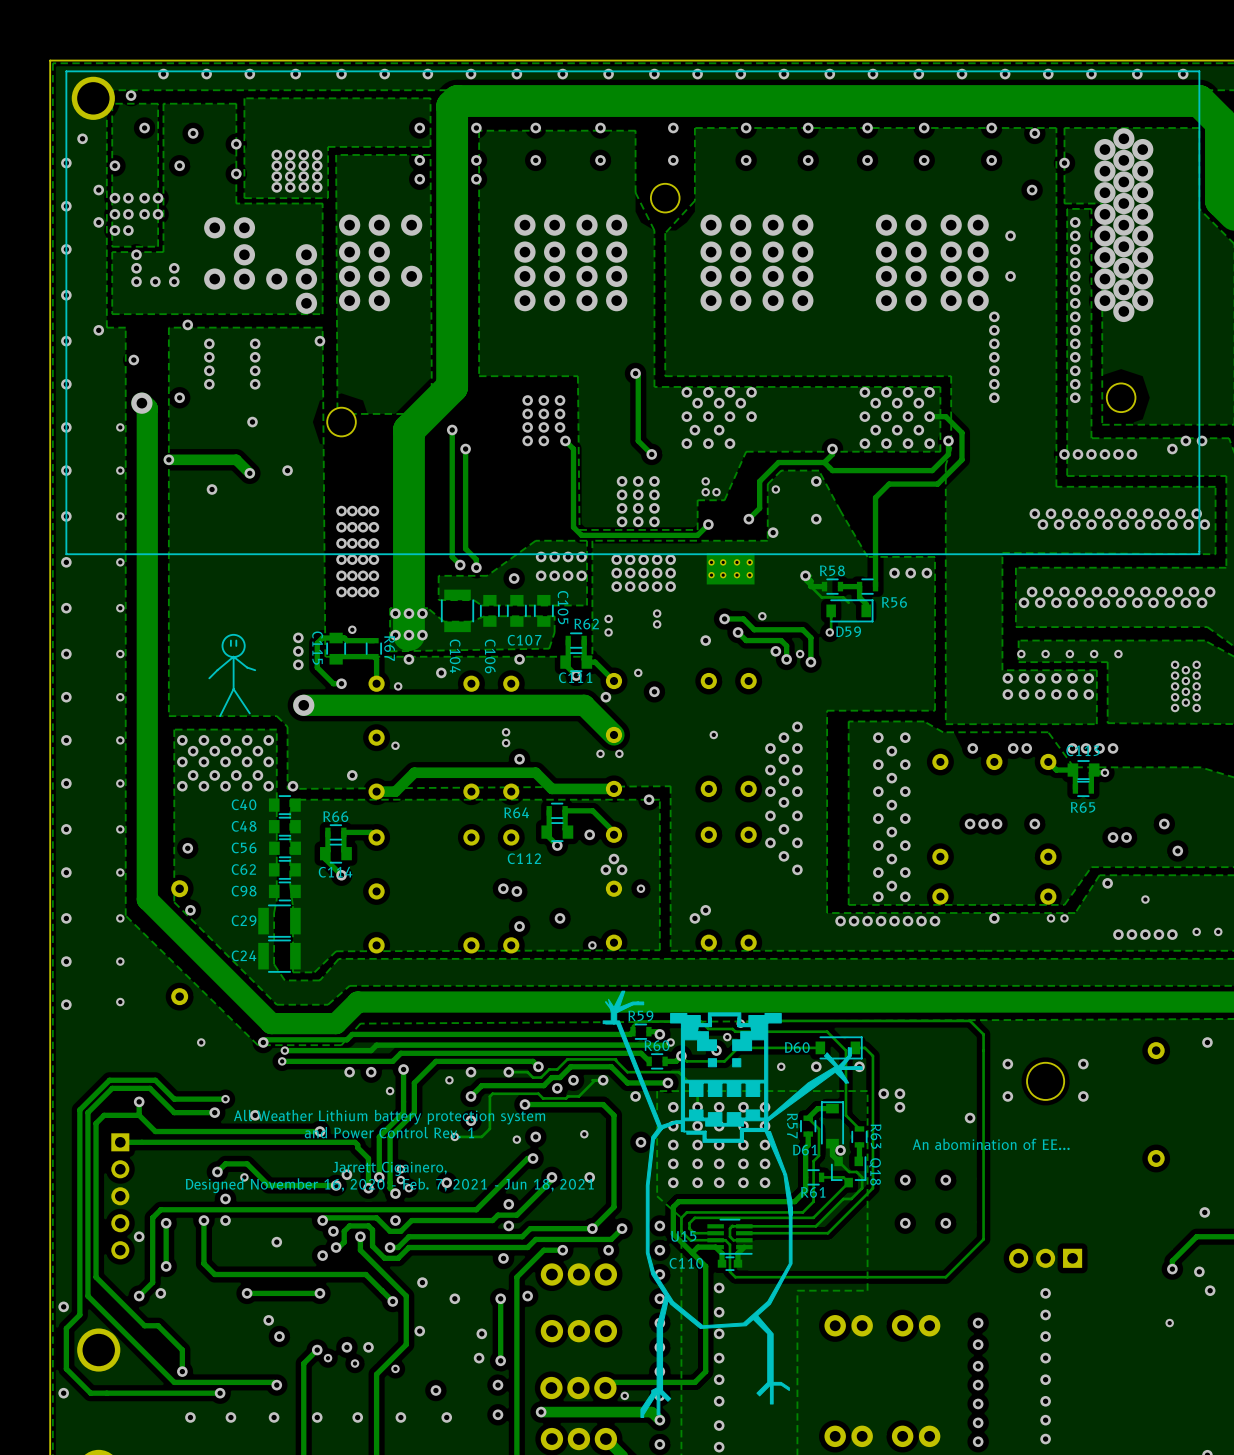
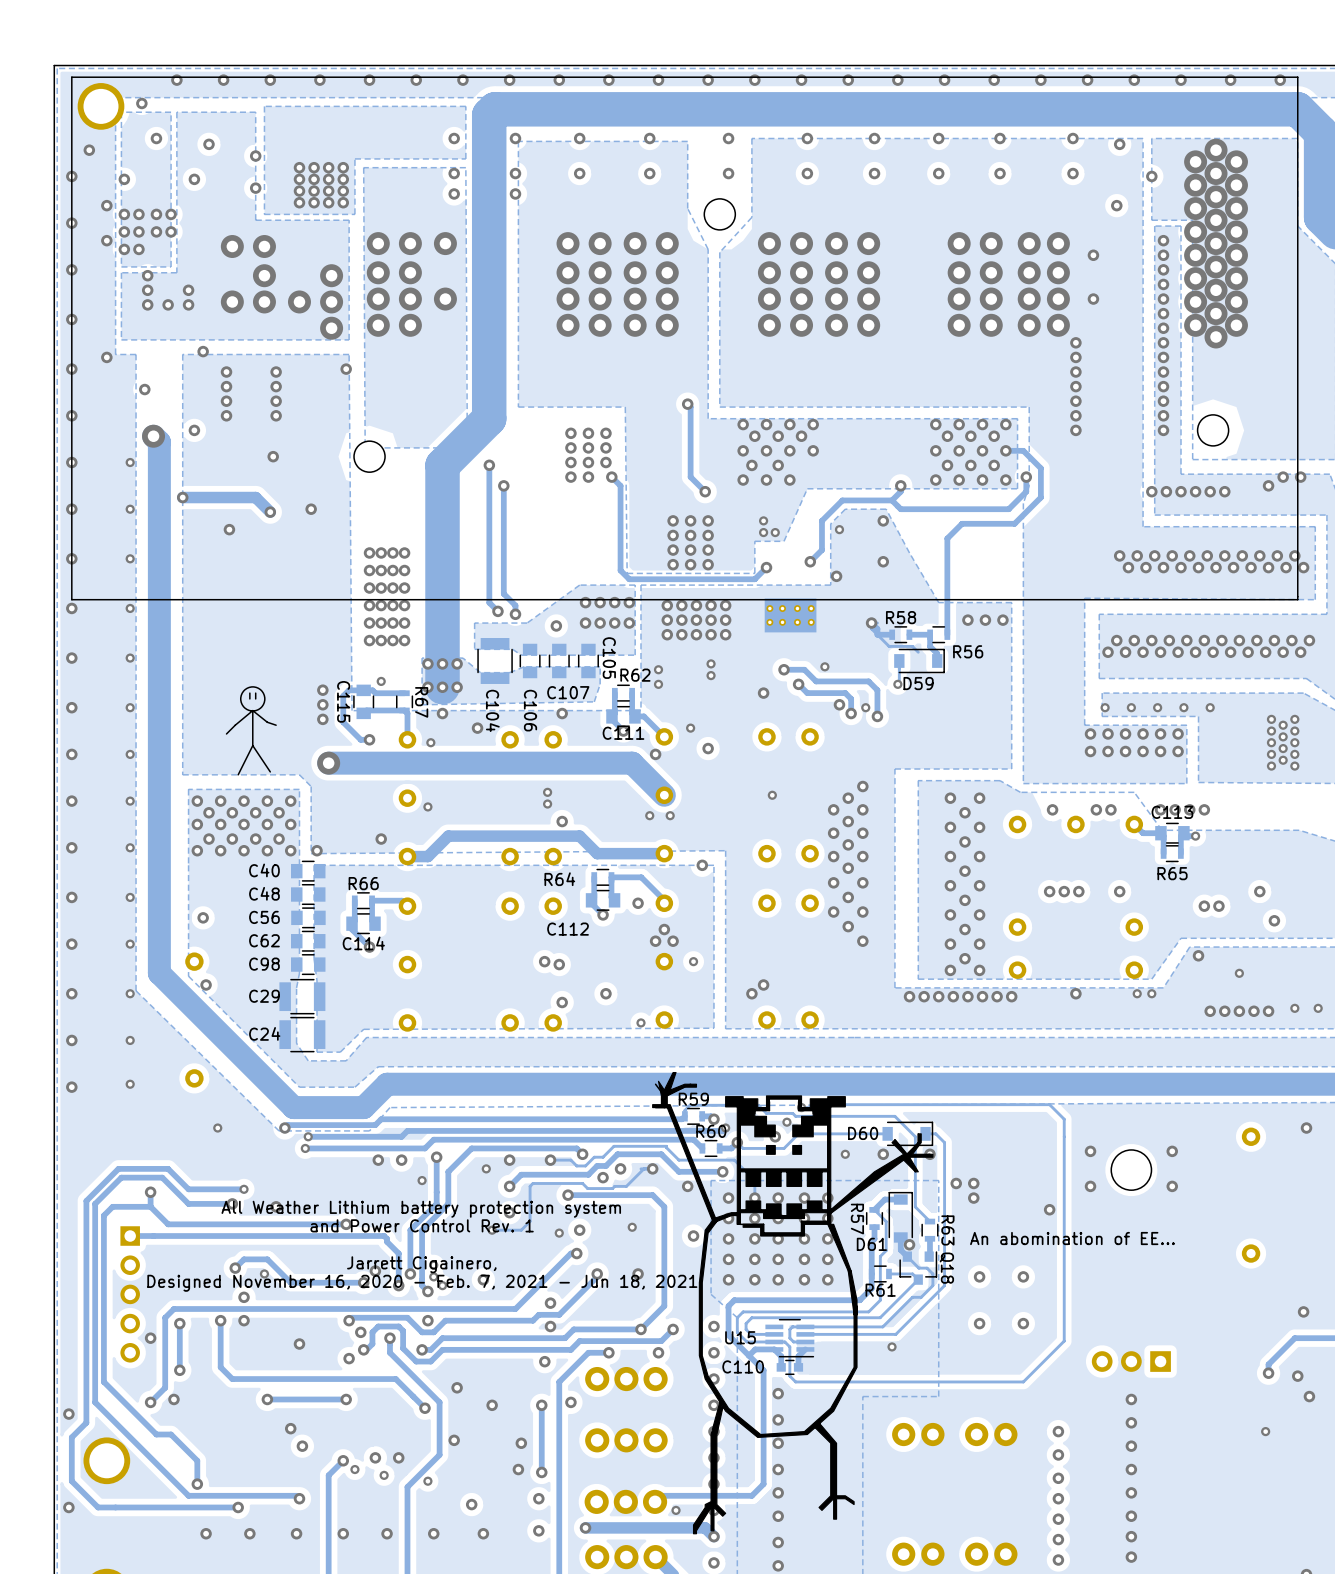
via: none -> (892, 1346)

